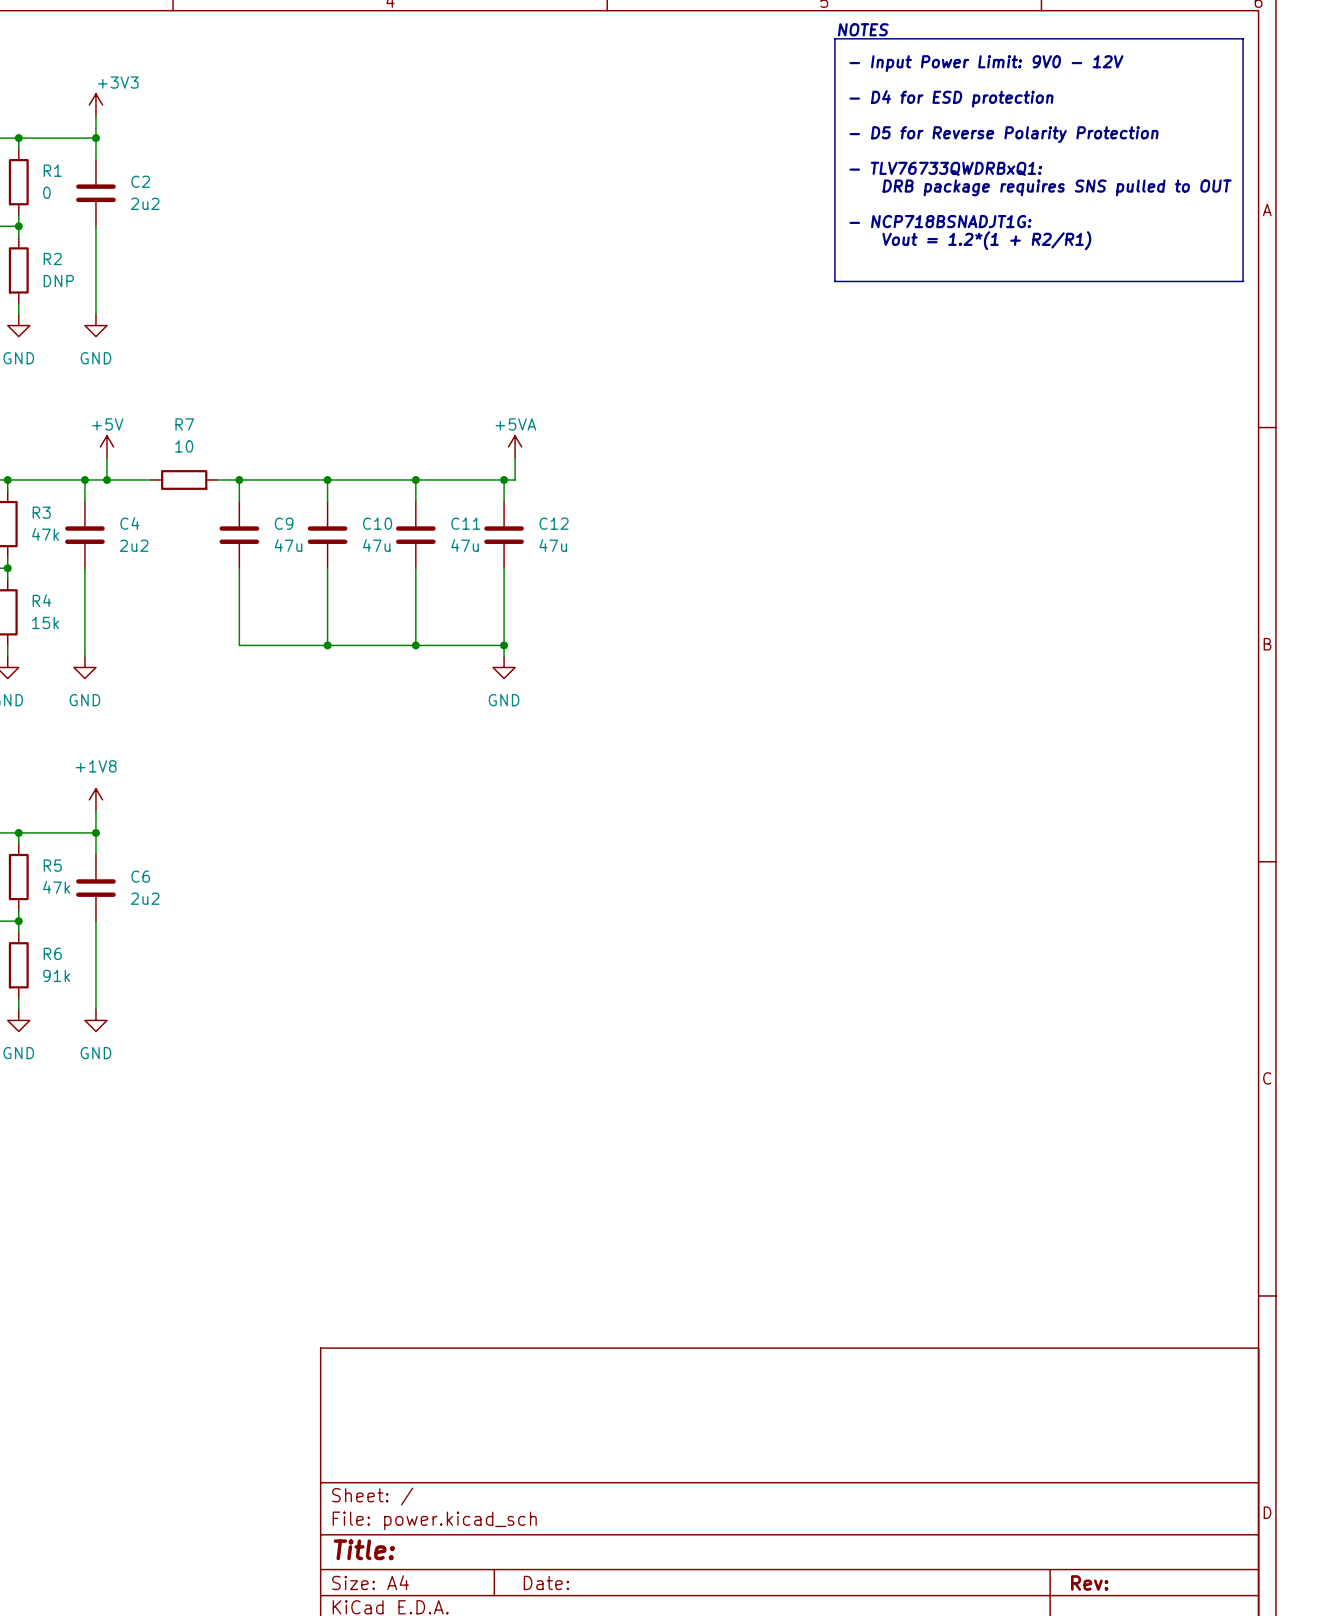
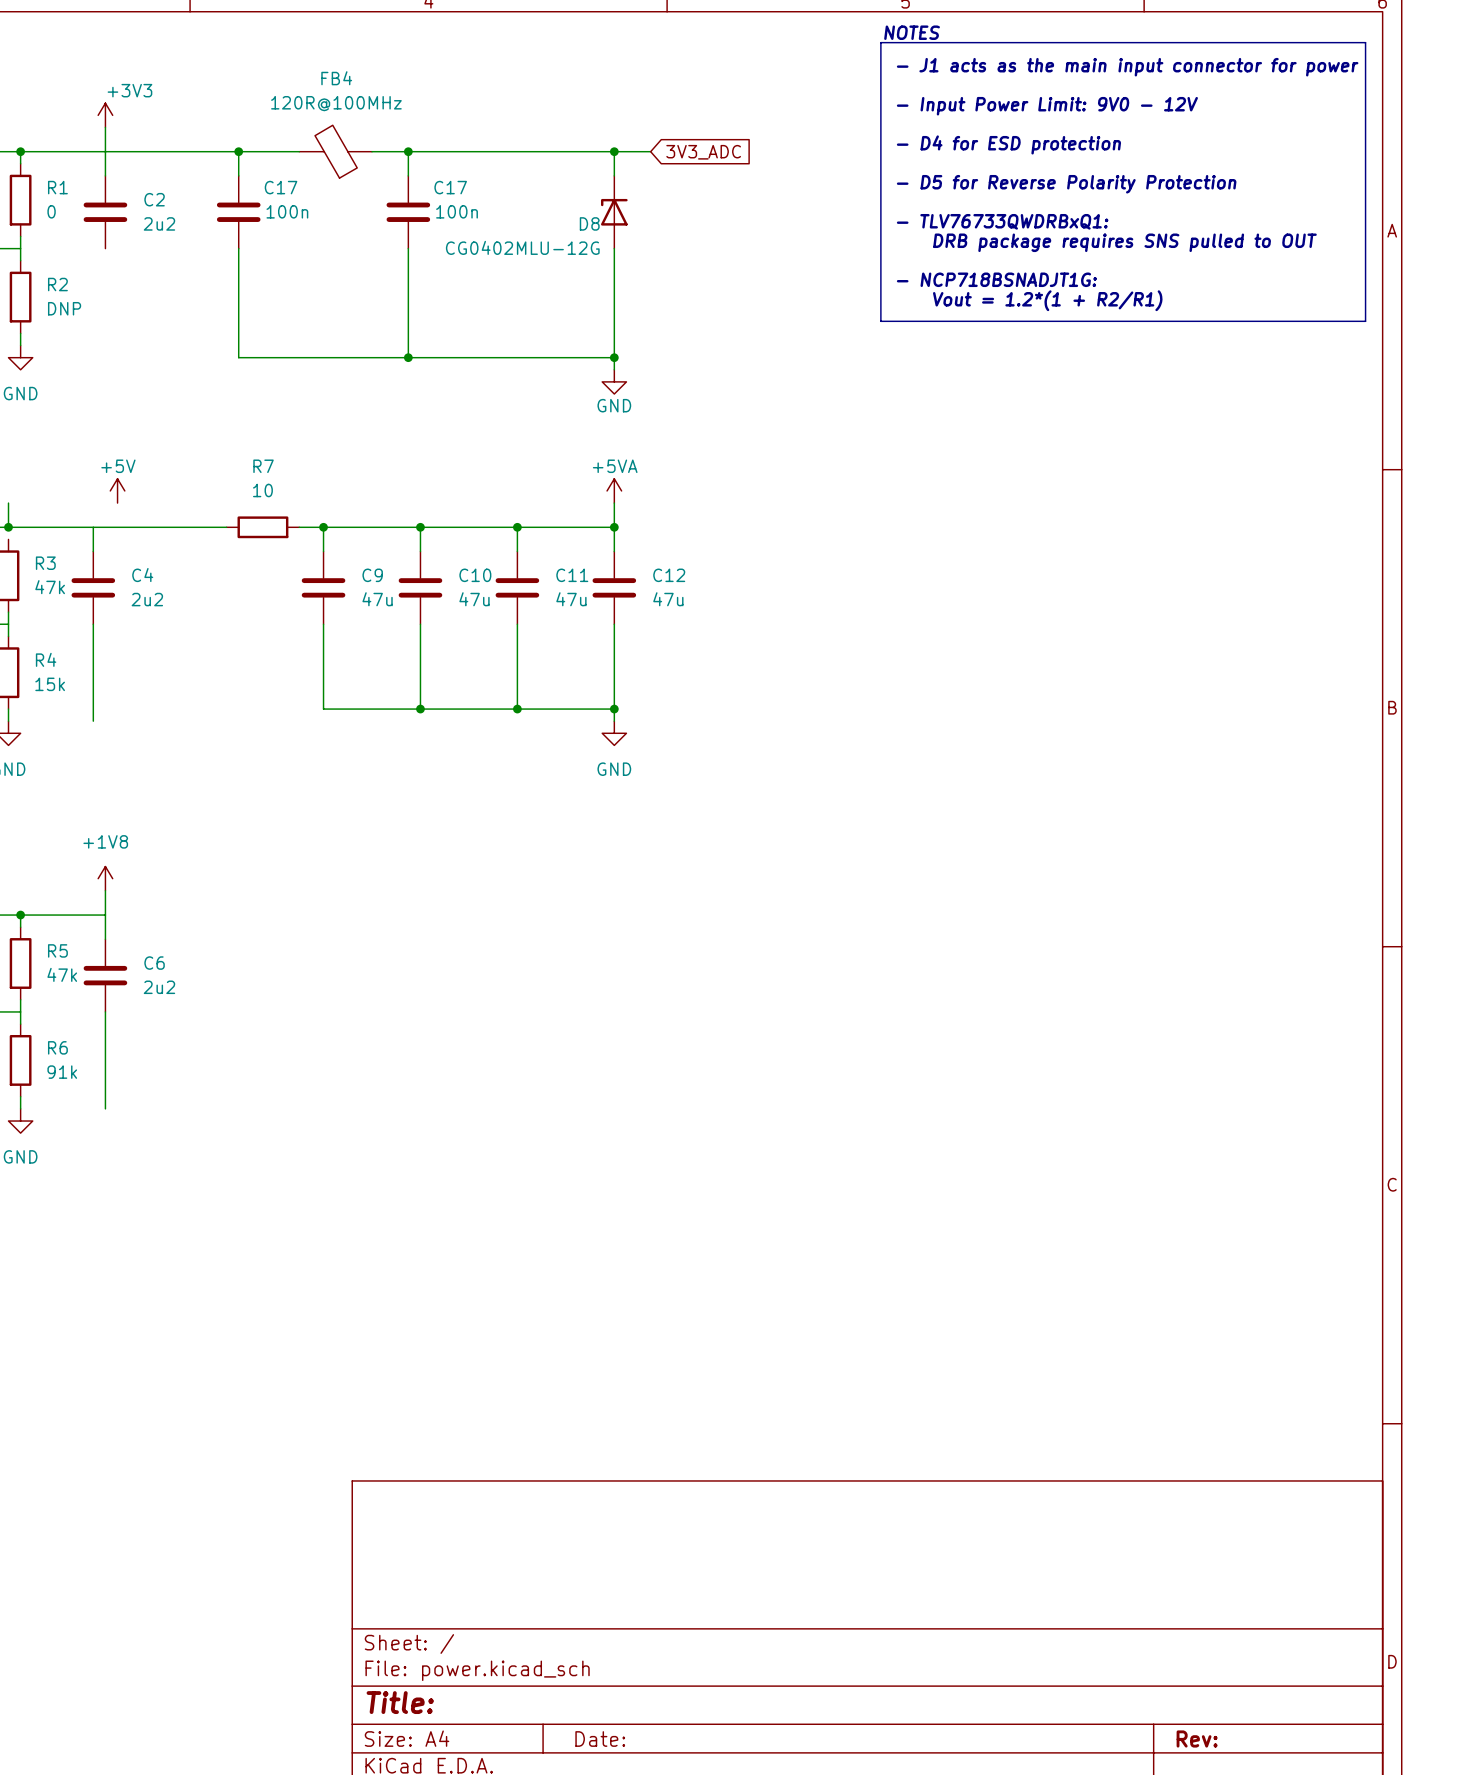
text position: NOTES (863, 29) -> NOTES (912, 32)
line: (834, 38) (834, 281) (1243, 281) -> (917, 42) (880, 42) (880, 321) (1365, 321) (1365, 309)
text: none -> - J1 acts as the main input connector for power (1127, 67)
text position: - Input Power Limit: 9V0 - 12V (986, 63) -> - Input Power Limit: 9V0 - 12V (1047, 106)
text position: - D4 for ESD protection (951, 98) -> - D4 for ESD protection (1008, 144)
text position: - D5 for Reverse Polarity Protection (1004, 134) -> - D5 for Reverse Polarity Protection (1066, 184)
wire: none -> (105, 151) (299, 151)
junction: (95, 138) -> none
wire: none -> (238, 151) (238, 175)
junction: none -> (238, 151)
FB4: none -> 120R@100MHz (335, 151)
wire: none -> (372, 151) (650, 151)
wire: none -> (408, 151) (408, 175)
junction: none -> (408, 151)
wire: none -> (614, 151) (614, 175)
junction: none -> (614, 151)
global label: none -> 3V3_ADC (703, 152)
text position: - TLV76733QWDRBxQ1: (945, 168) -> - TLV76733QWDRBxQ1: (1002, 221)
text position: DRB package requires SNS pulled to OUT (1057, 187) -> DRB package requires SNS pulled to OUT (1125, 242)
C17: none -> 100n (238, 212)
C17: none -> 100n (408, 212)
D8: none -> CG0402MLU-12G (614, 212)
text position: - NCP718BSNADJT1G: (940, 221) -> - NCP718BSNADJT1G: (996, 279)
junction: (18, 226) -> none
wire: (95, 226) (95, 314) -> none
wire: none -> (238, 248) (238, 357) (614, 357)
wire: none -> (408, 248) (408, 357)
wire: none -> (614, 248) (614, 369)
text position: Vout = 1.2*(1 + R2/R1) (986, 240) -> Vout = 1.2*(1 + R2/R1) (1047, 300)
power symbol: GND (95, 325) -> none
junction: none -> (408, 357)
junction: none -> (614, 357)
power symbol: none -> GND (614, 381)
power symbol position: +5VA (515, 446) -> +5VA (614, 490)
wire: (107, 457) (107, 479) -> none
wire: (515, 457) (515, 479) -> (614, 527) (565, 527)
wire: none -> (614, 503) (614, 551)
wire: (7, 479) (7, 491) -> (8, 527) (8, 503)
junction: (84, 479) -> none
junction: (107, 479) -> none
R7 position: (184, 479) -> (262, 527)
wire: (217, 479) (272, 479) -> (166, 527) (226, 527)
wire: (239, 479) (239, 502) -> (323, 527) (323, 551)
junction: (239, 479) -> none
junction: none -> (323, 527)
wire: (327, 479) (327, 502) -> (420, 527) (420, 551)
junction: (327, 479) -> none
junction: none -> (420, 527)
wire: (415, 479) (415, 502) -> (517, 527) (517, 551)
junction: (415, 479) -> none
junction: none -> (517, 527)
wire: (504, 479) (504, 502) -> none
junction: (504, 479) -> none
junction: none -> (614, 527)
C9 position: (239, 535) -> (323, 587)
C10 position: (327, 535) -> (420, 587)
C11 position: (415, 535) -> (517, 587)
C12 position: (504, 535) -> (614, 587)
junction: (7, 568) -> none
wire: (239, 568) (239, 645) (294, 645) -> (323, 624) (323, 709)
wire: (327, 568) (327, 645) -> (420, 624) (420, 709)
wire: (415, 568) (415, 645) -> (517, 624) (517, 709)
wire: (504, 568) (504, 656) -> (614, 624) (614, 721)
junction: (327, 645) -> none
junction: none -> (420, 709)
junction: (415, 645) -> none
junction: none -> (517, 709)
wire: none -> (553, 709) (614, 709)
junction: (504, 645) -> none
junction: none -> (614, 709)
power symbol: GND (84, 667) -> none
power symbol position: GND (504, 667) -> GND (614, 733)
junction: (95, 832) -> none
junction: (18, 921) -> none
power symbol: GND (95, 1020) -> none

